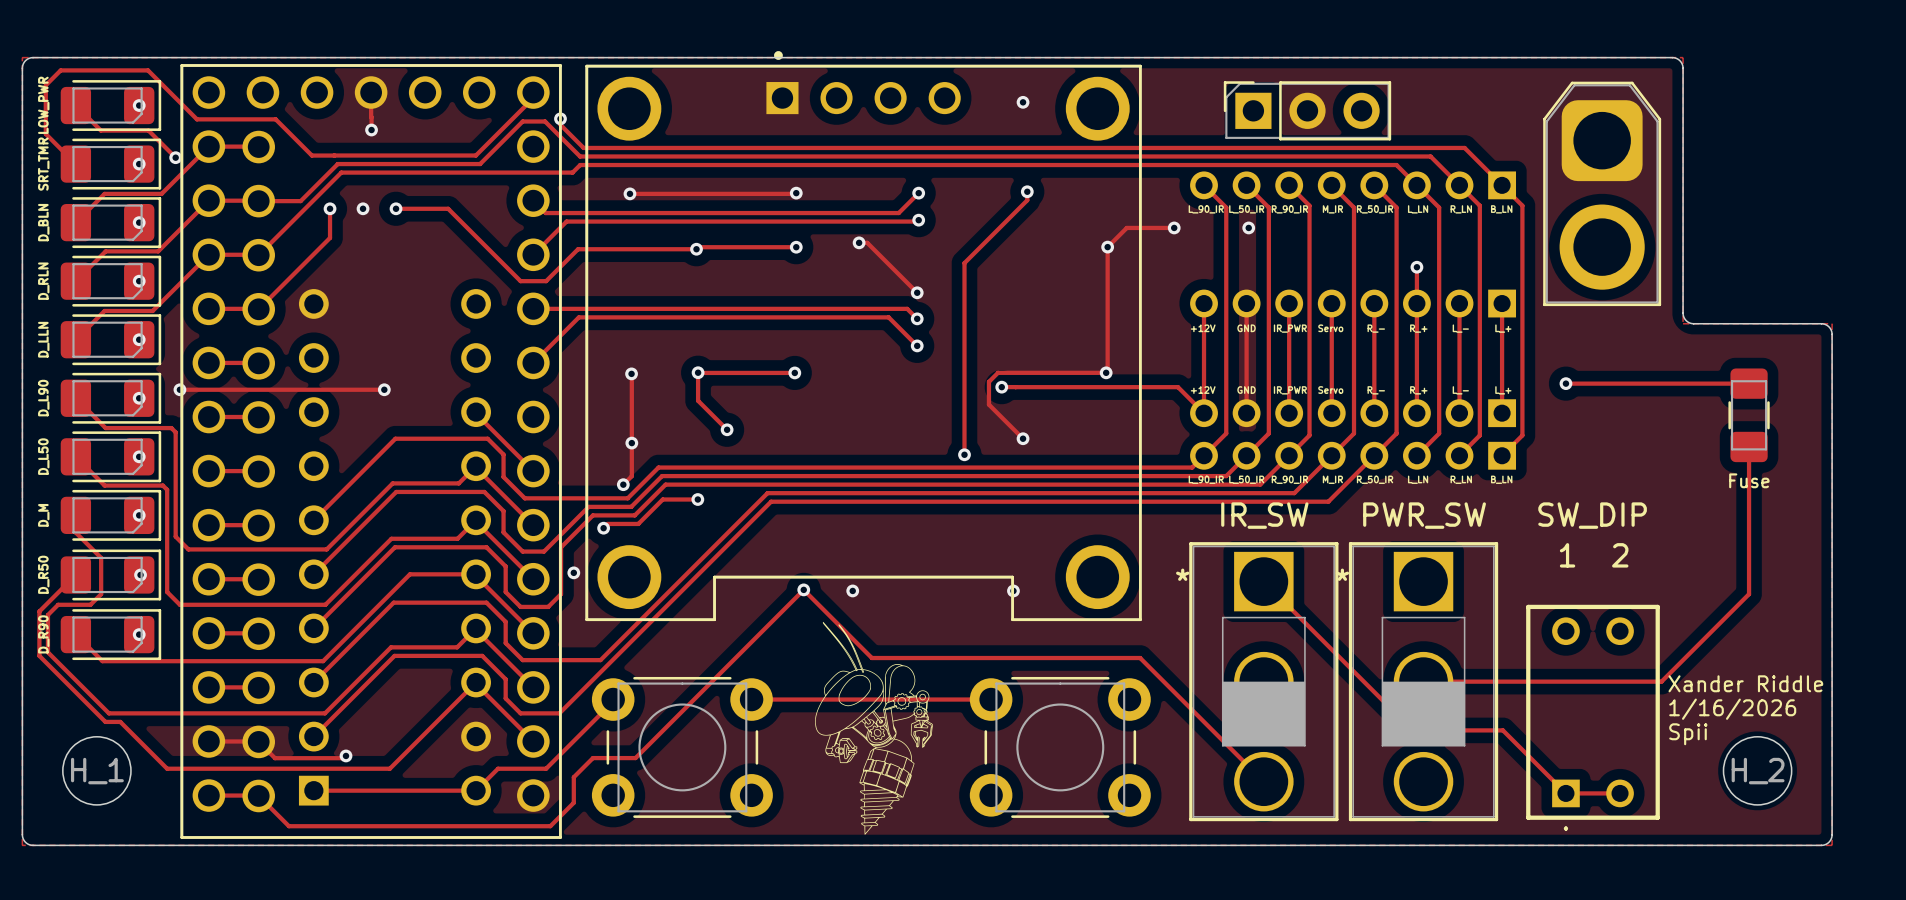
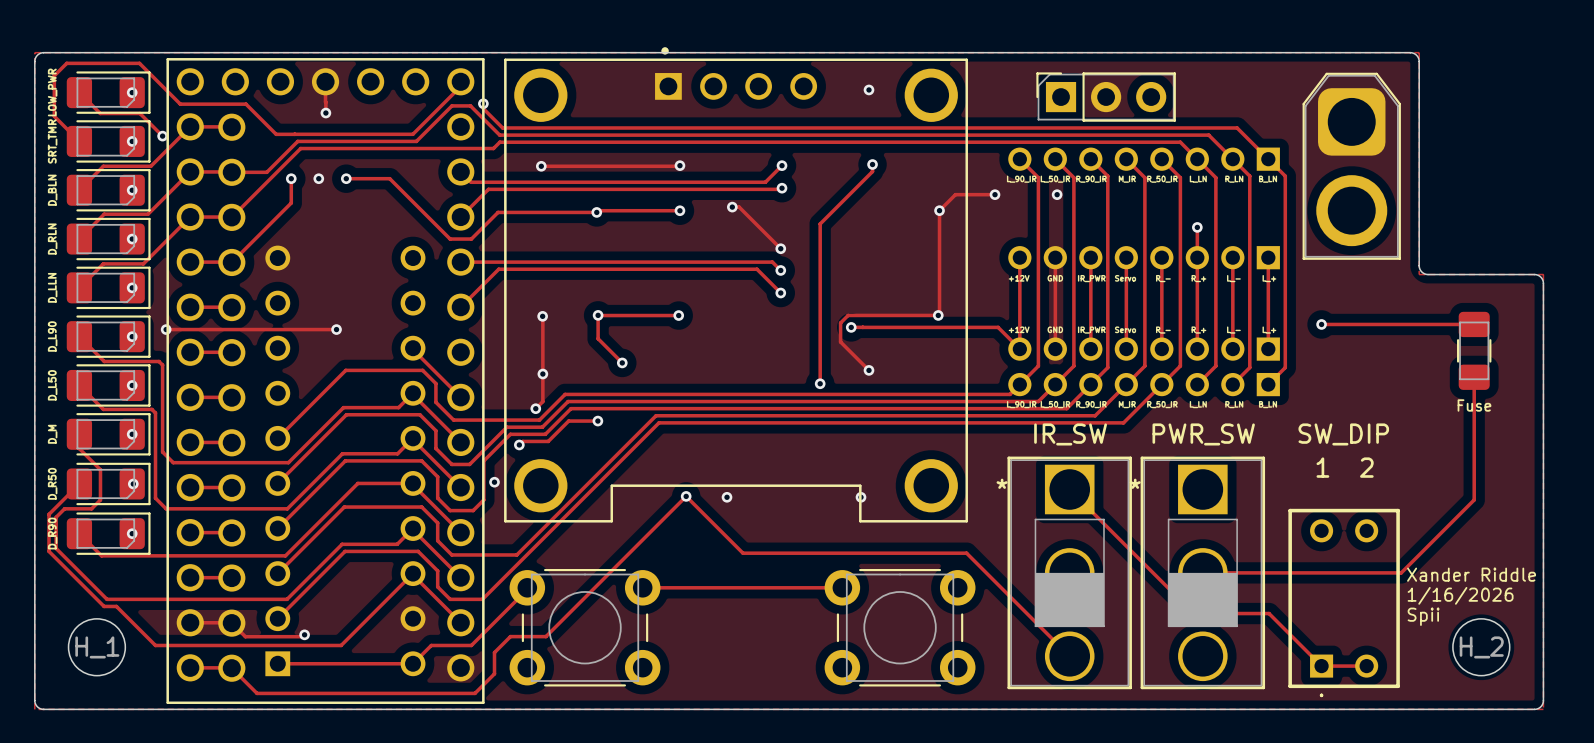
drawing: [815, 621, 934, 835] -> none

